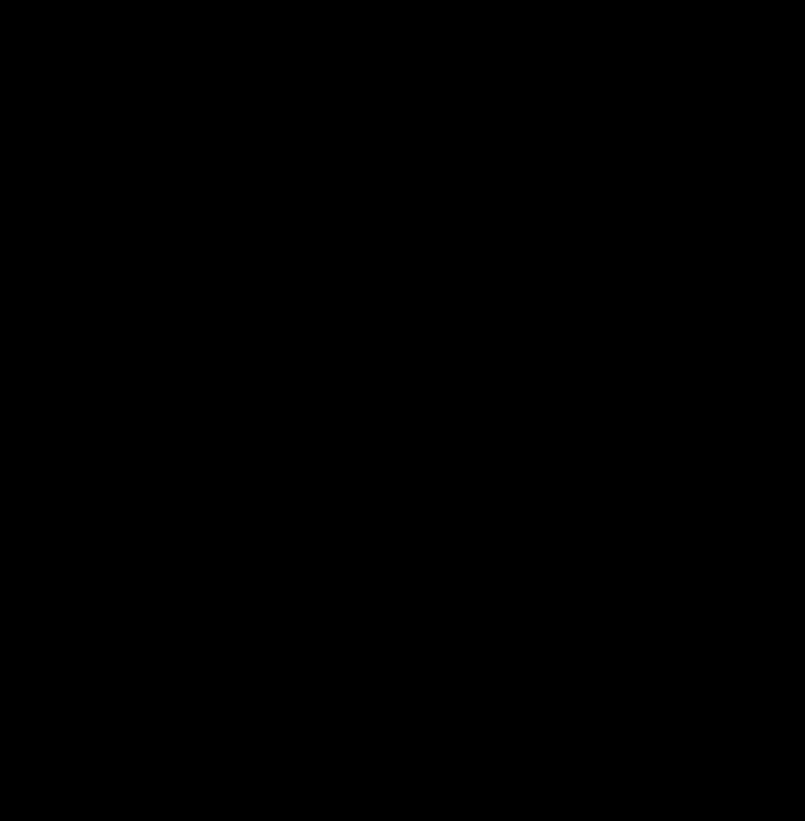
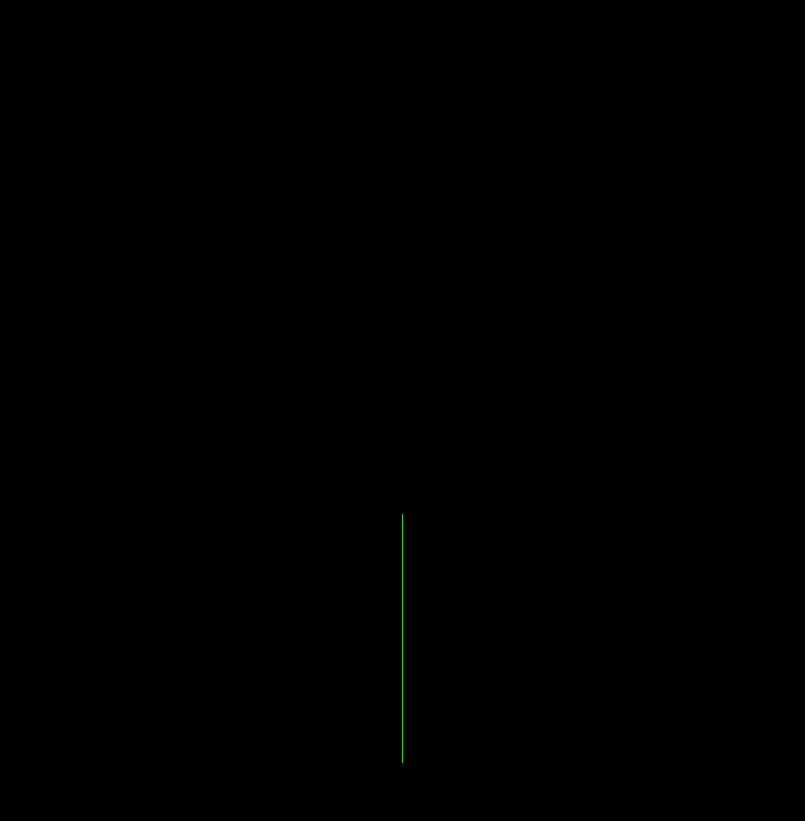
wire: none -> (402, 514) (402, 762)

